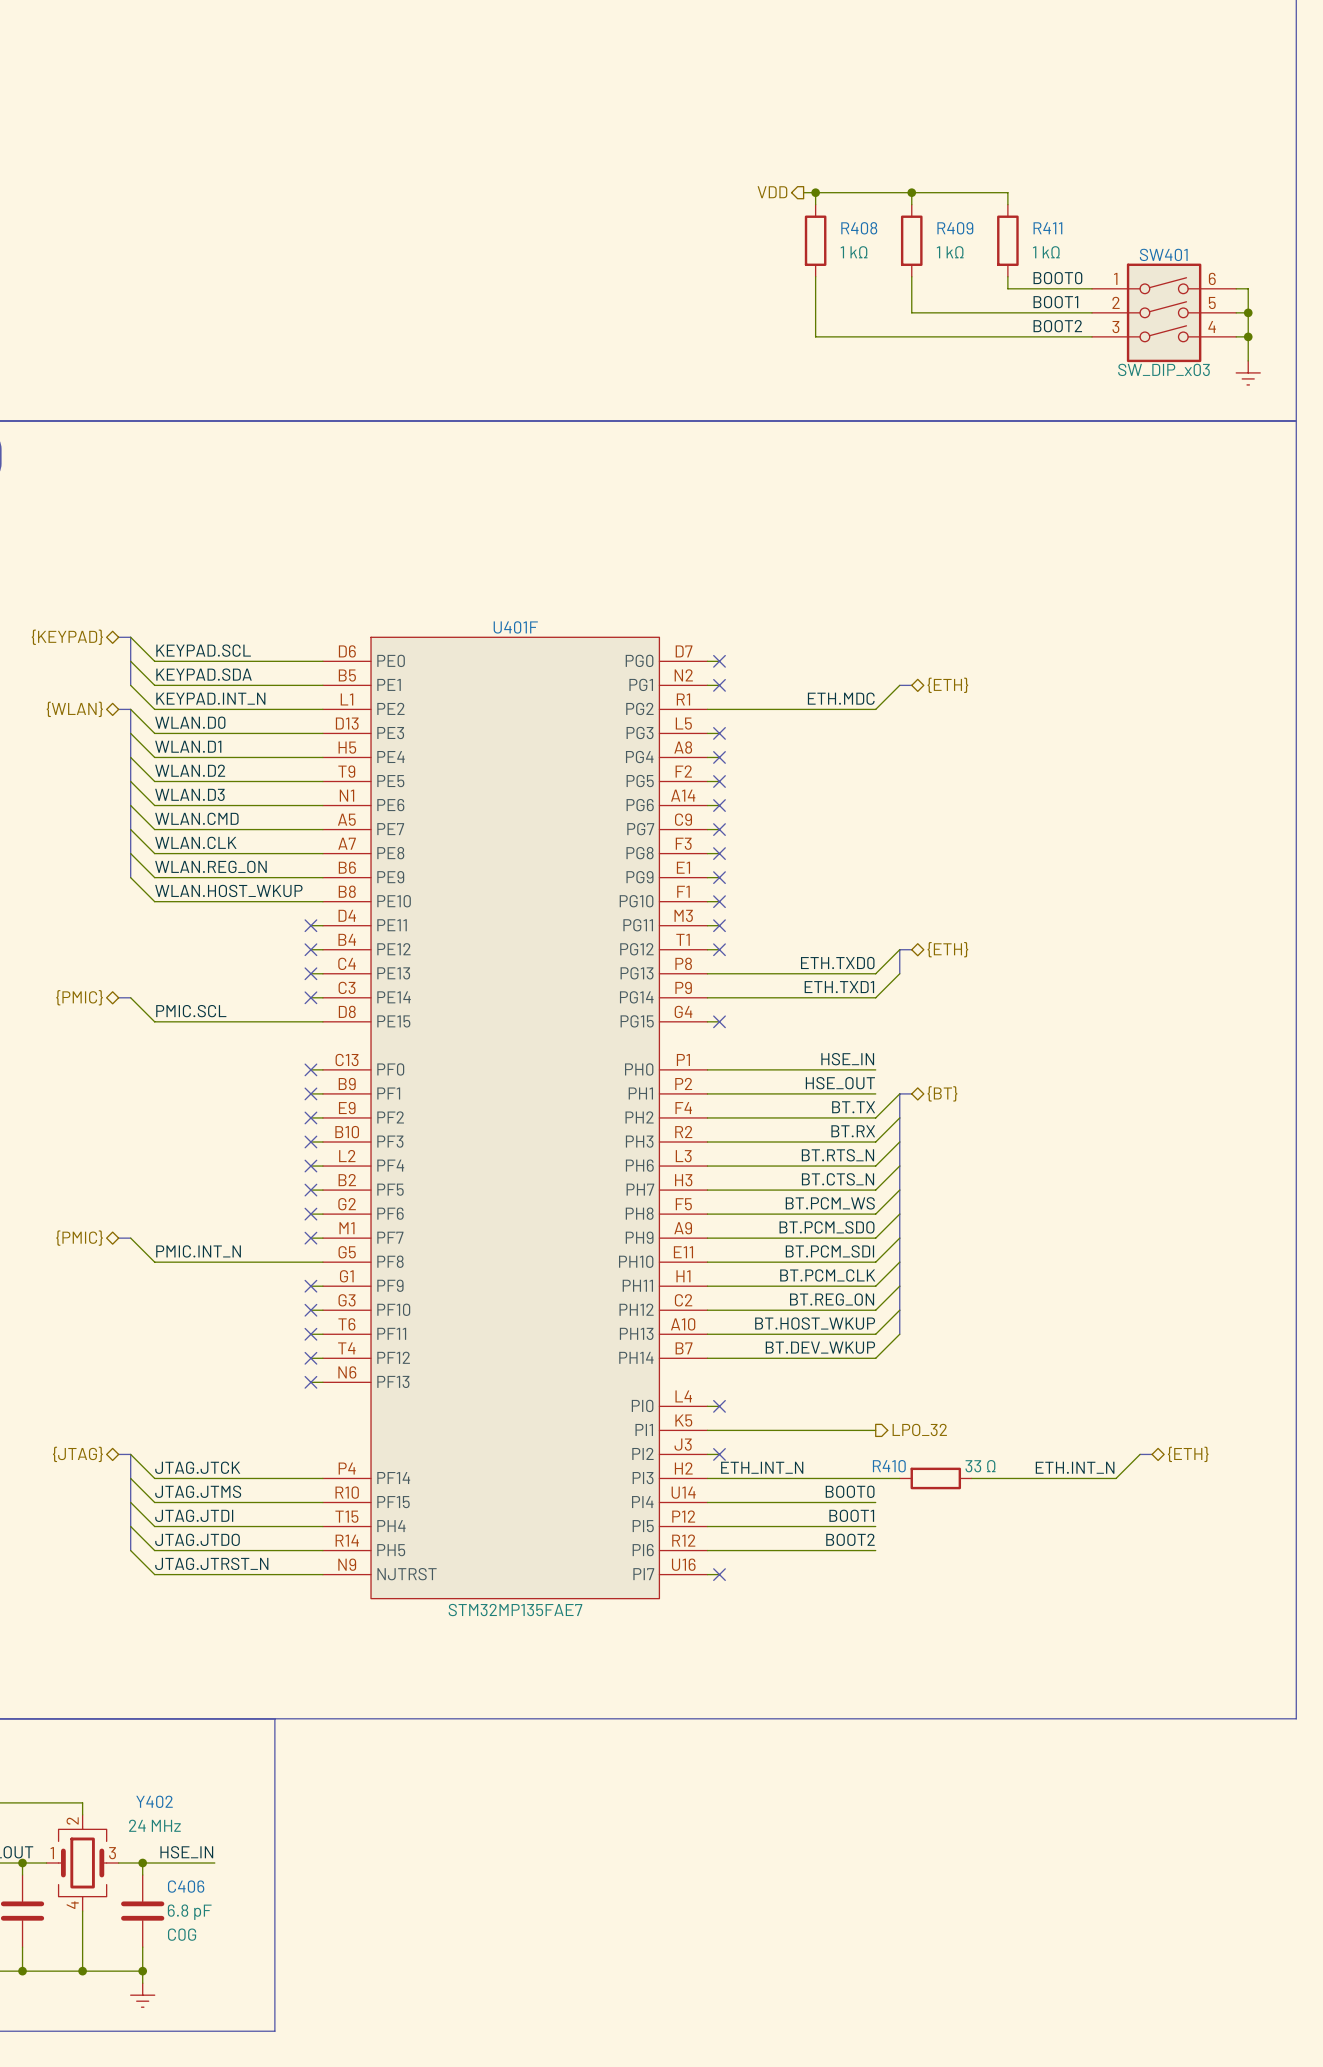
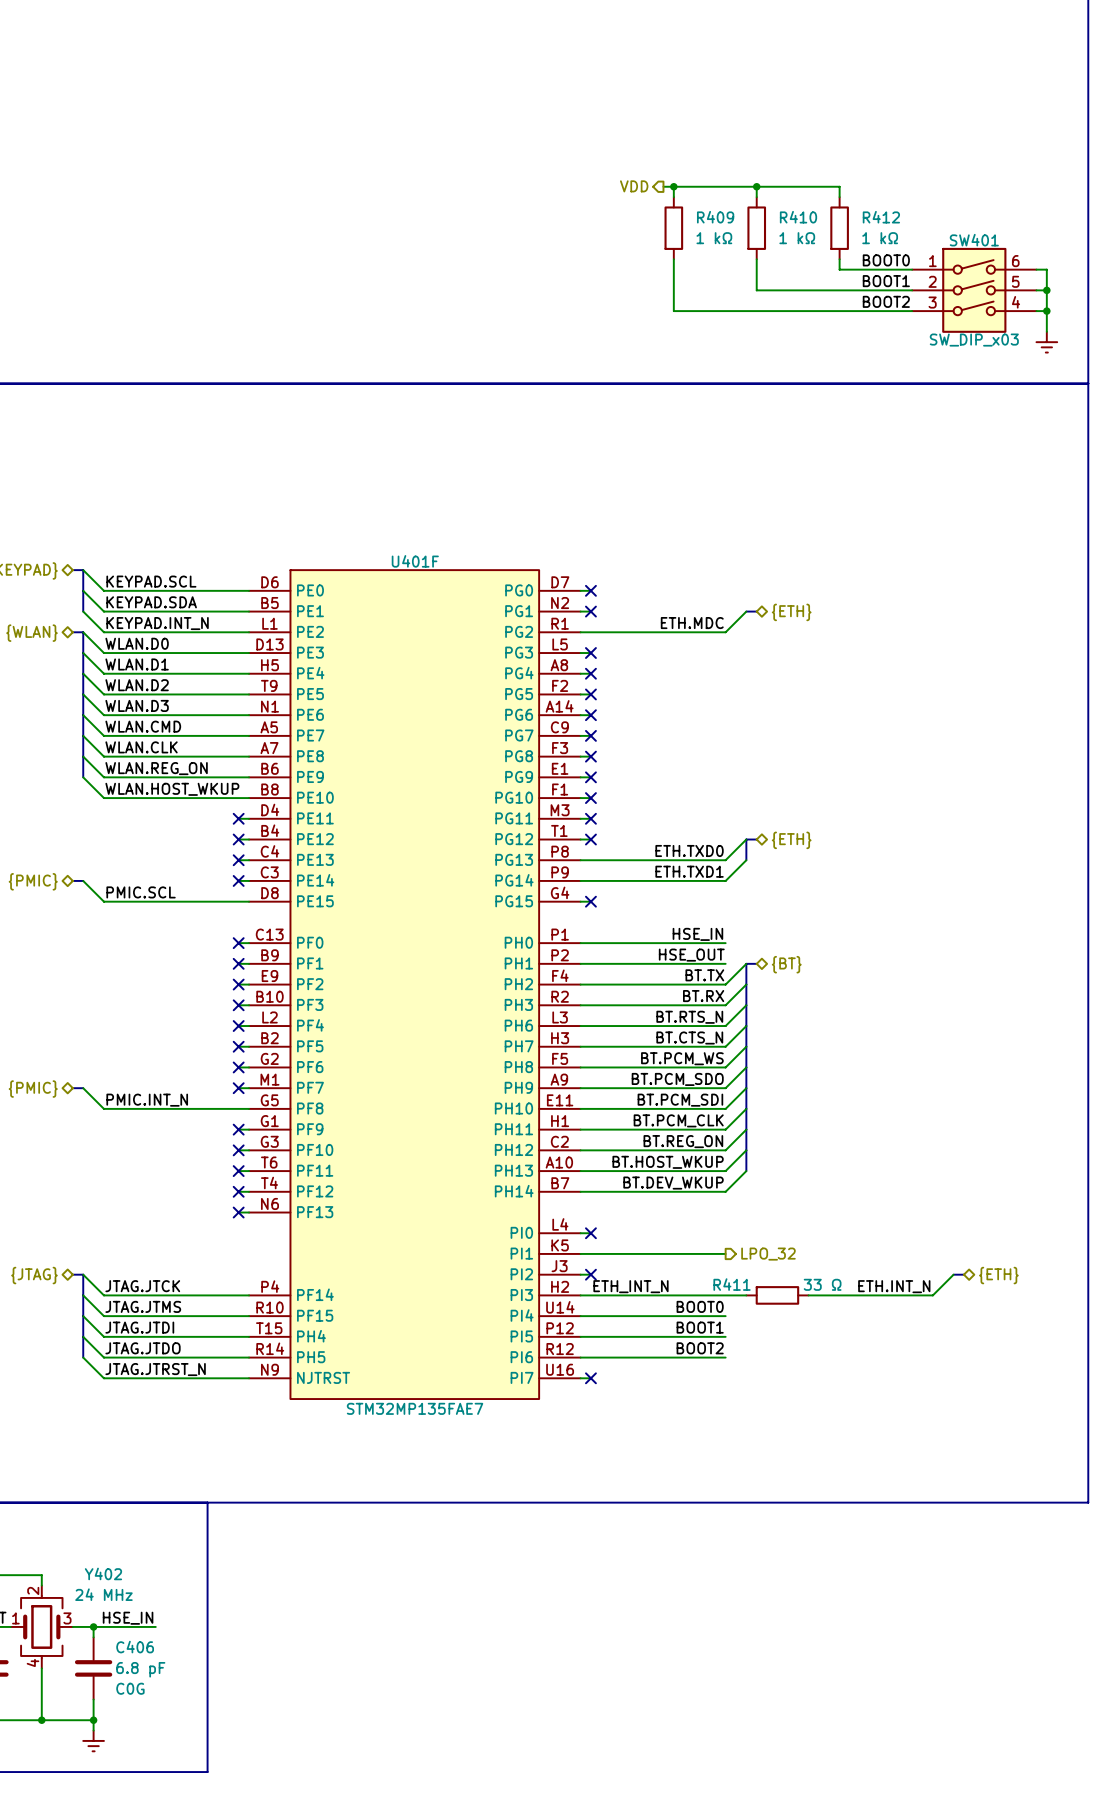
R408 name: R408 (859, 228) -> R409 (715, 217)
R409 name: R409 (955, 228) -> R410 (798, 217)
R411 name: R411 (1047, 228) -> R412 (881, 217)
R410 name: R410 (889, 1466) -> R411 (732, 1284)

